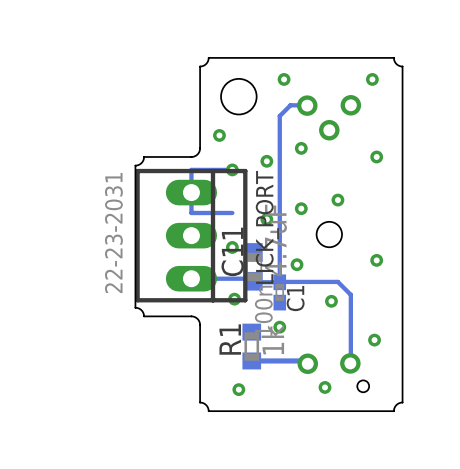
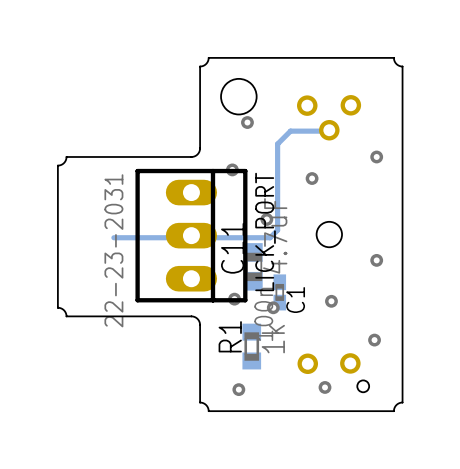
via: (284, 79) -> none
via: (372, 79) -> none
track: (307, 105) (290, 105) (279, 116) (279, 282) (254, 282) (254, 278) (191, 278) -> none
via: none -> (247, 122)
track: none -> (329, 130) (290, 131) (277, 144) (277, 230) (270, 237) (113, 237)
via: (219, 135) -> none
via: (301, 148) -> none
board edge: (144, 156) (141, 163) (135, 165) (135, 307) (141, 310) (144, 316) -> (144, 156) (66, 156) (64, 163) (57, 165) (57, 307) (64, 310) (66, 316) (144, 316)
via: (266, 161) -> none
track: (232, 169) (191, 169) (191, 212) (232, 212) -> none
via: none -> (312, 178)
via: (337, 200) -> none
via: (301, 208) -> none
via: (232, 247) -> none
via: (297, 264) -> none
track: (279, 281) (337, 281) (350, 294) (350, 363) -> none
via position: (279, 327) -> (273, 307)
track: (251, 360) (307, 360) (307, 363) -> none

